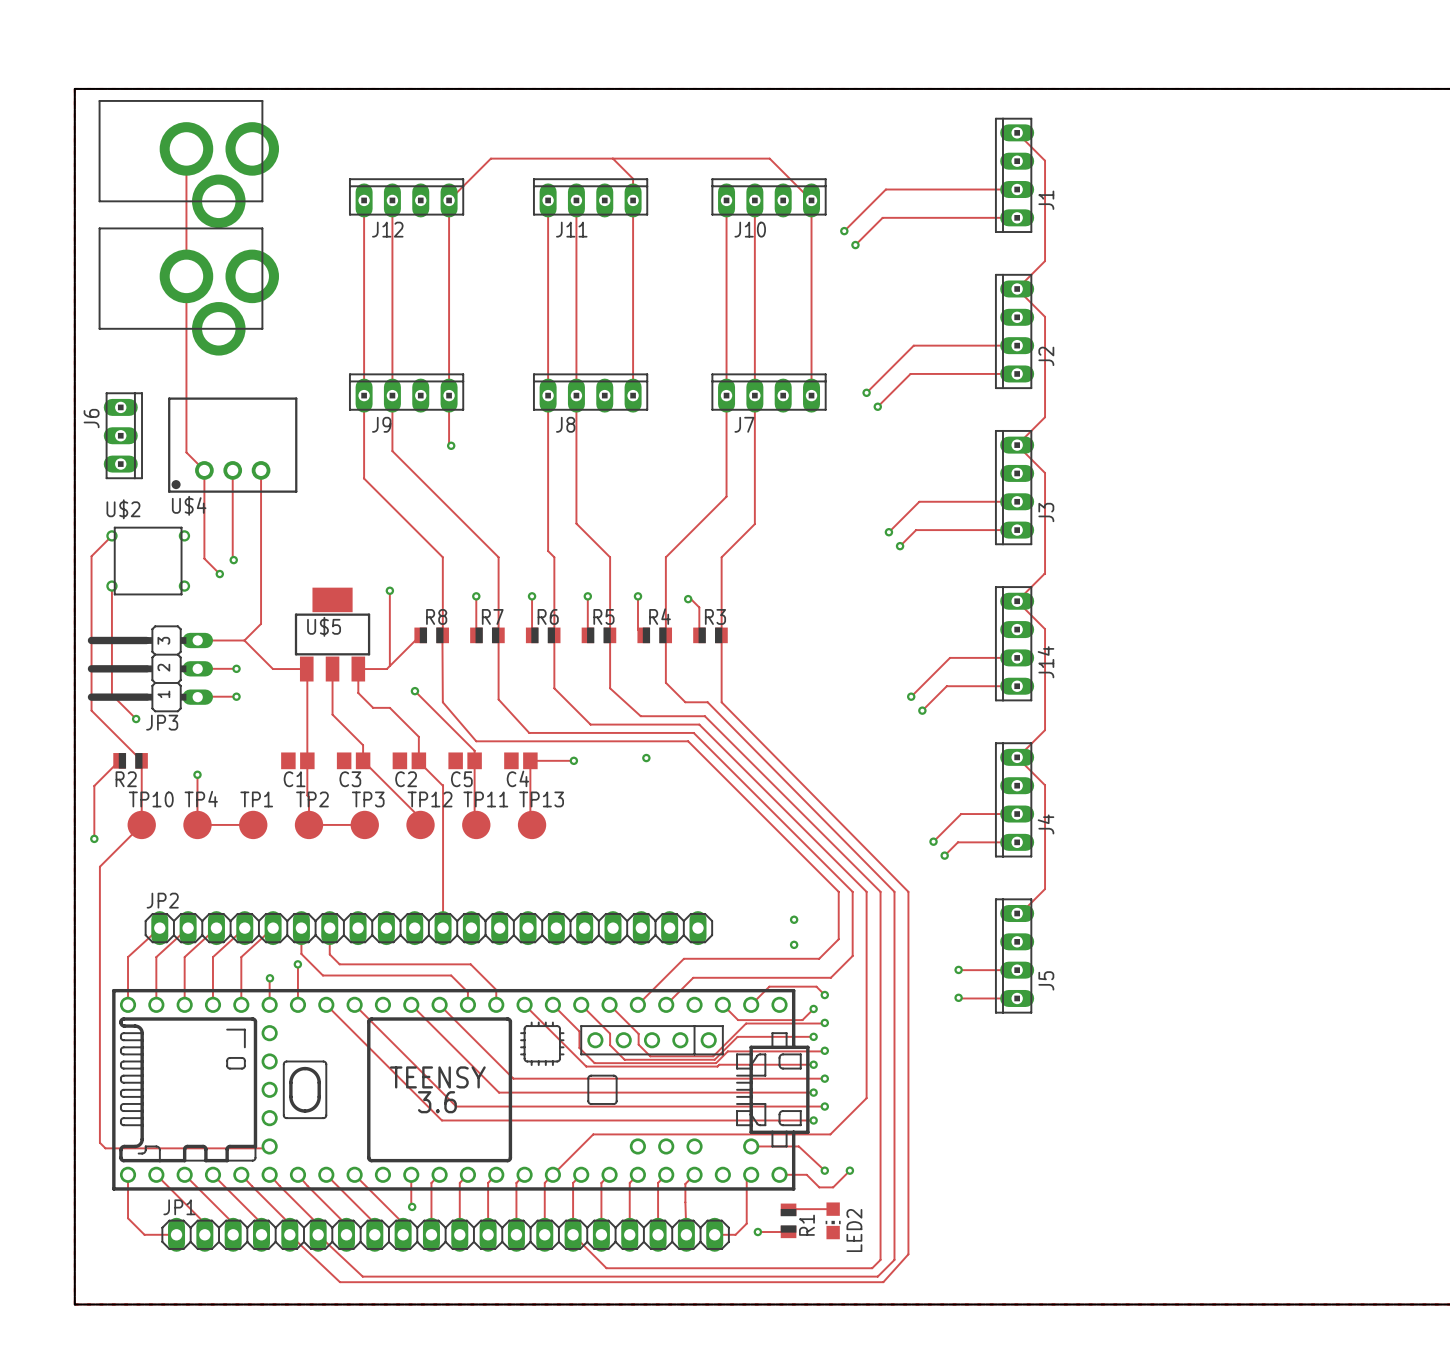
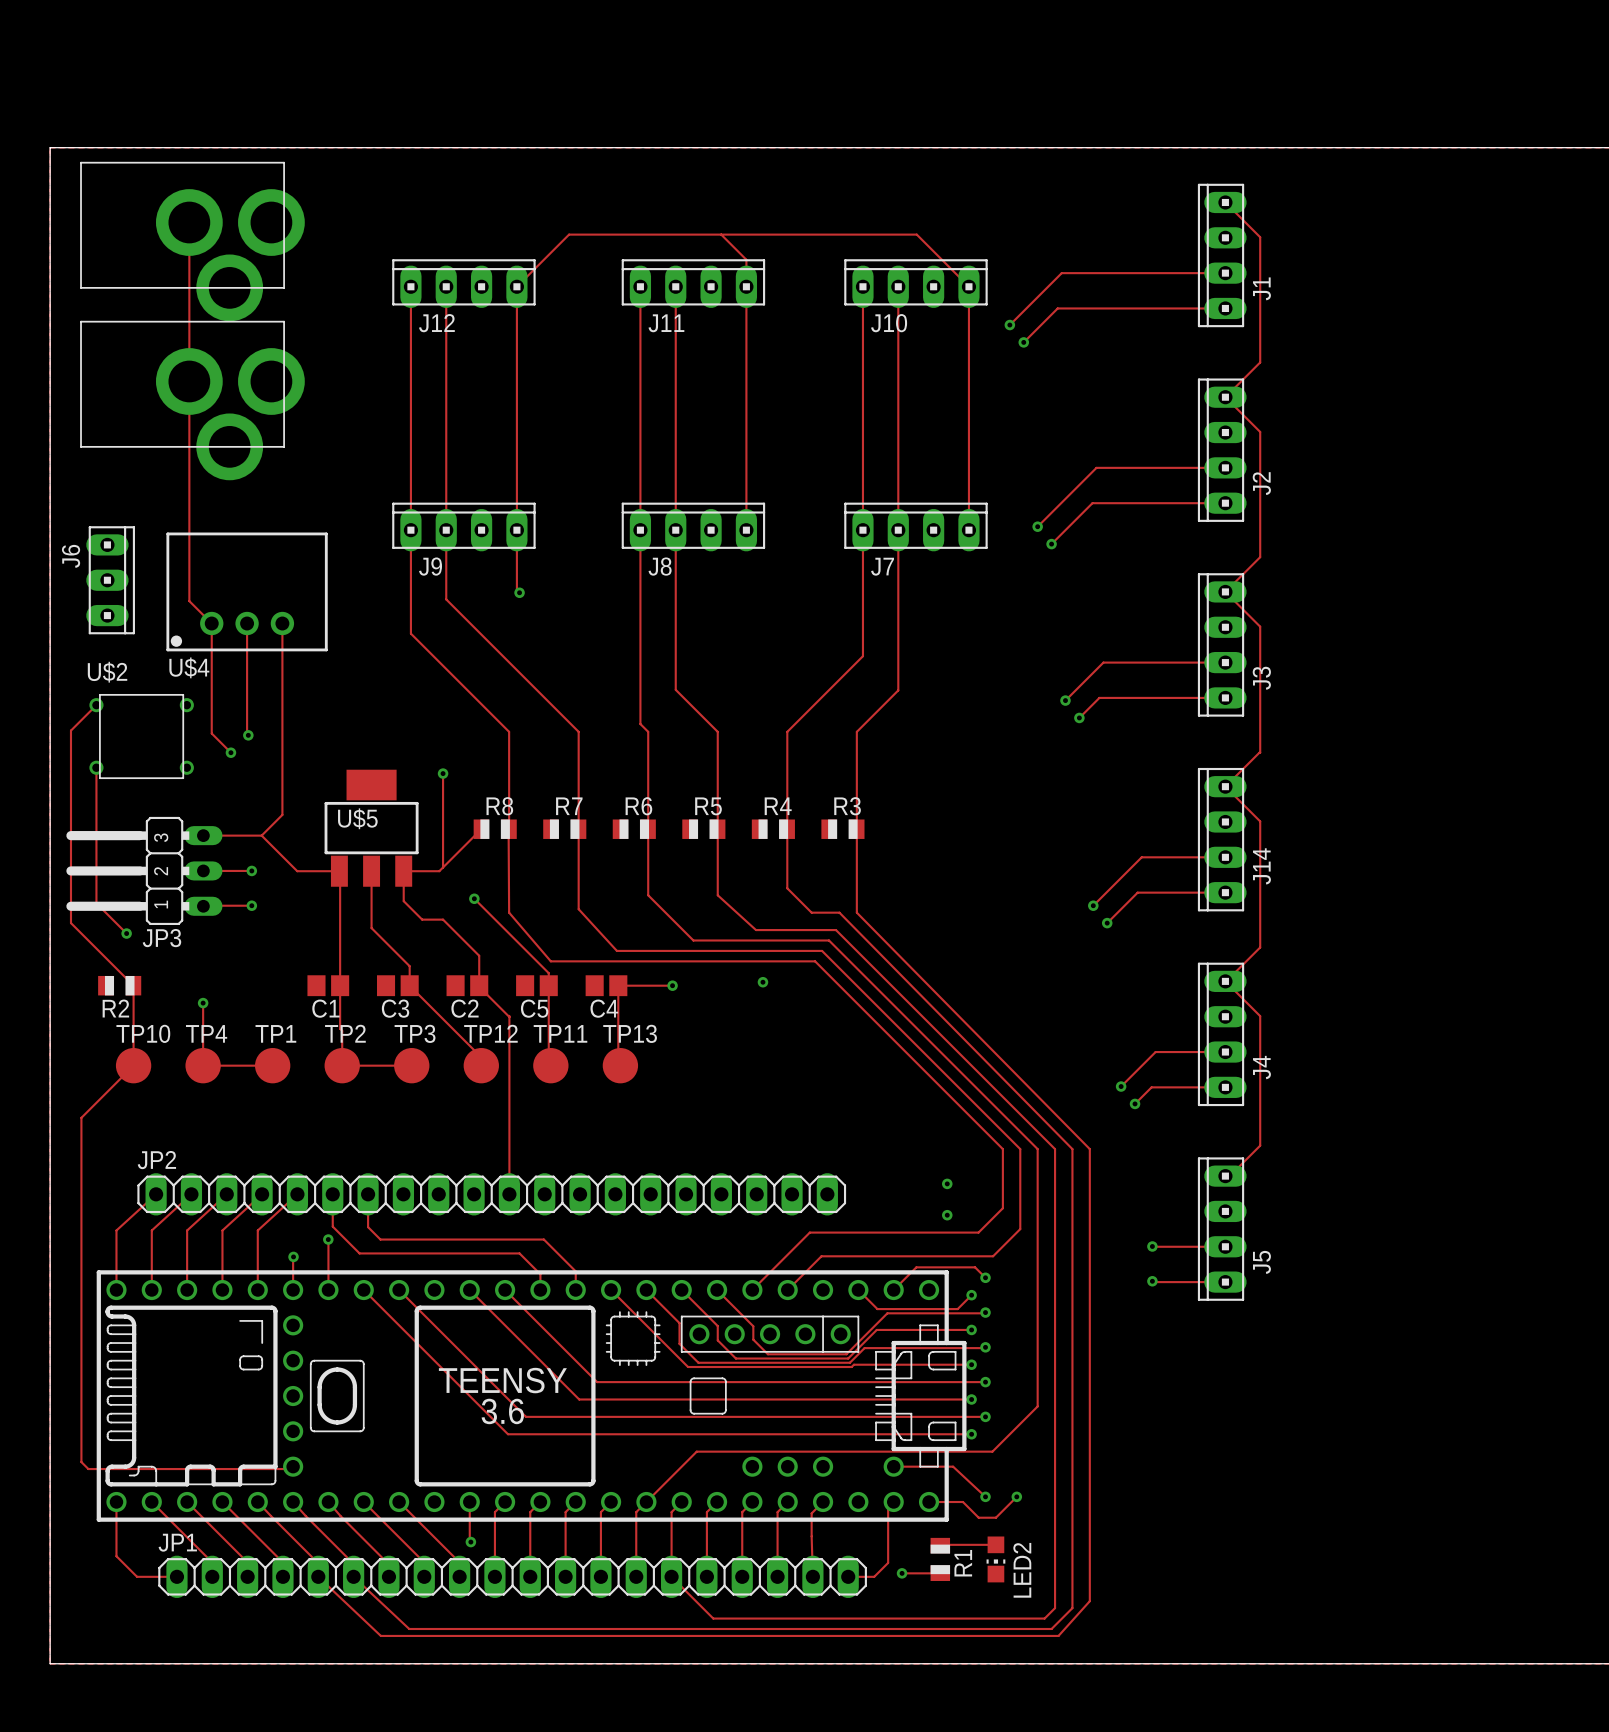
track: (476, 596) (476, 635) -> none
via: (476, 596) -> none
track: (532, 596) (532, 635) -> none
via: (532, 596) -> none
track: (587, 596) (587, 635) -> none
via: (587, 596) -> none
track: (637, 596) (637, 629) (643, 635) -> none
via: (637, 596) -> none
track: (688, 599) (688, 596) (699, 607) (699, 635) -> none
via: (688, 599) -> none
track: (119, 760) (94, 785) (94, 838) -> none
via: (94, 838) -> none

